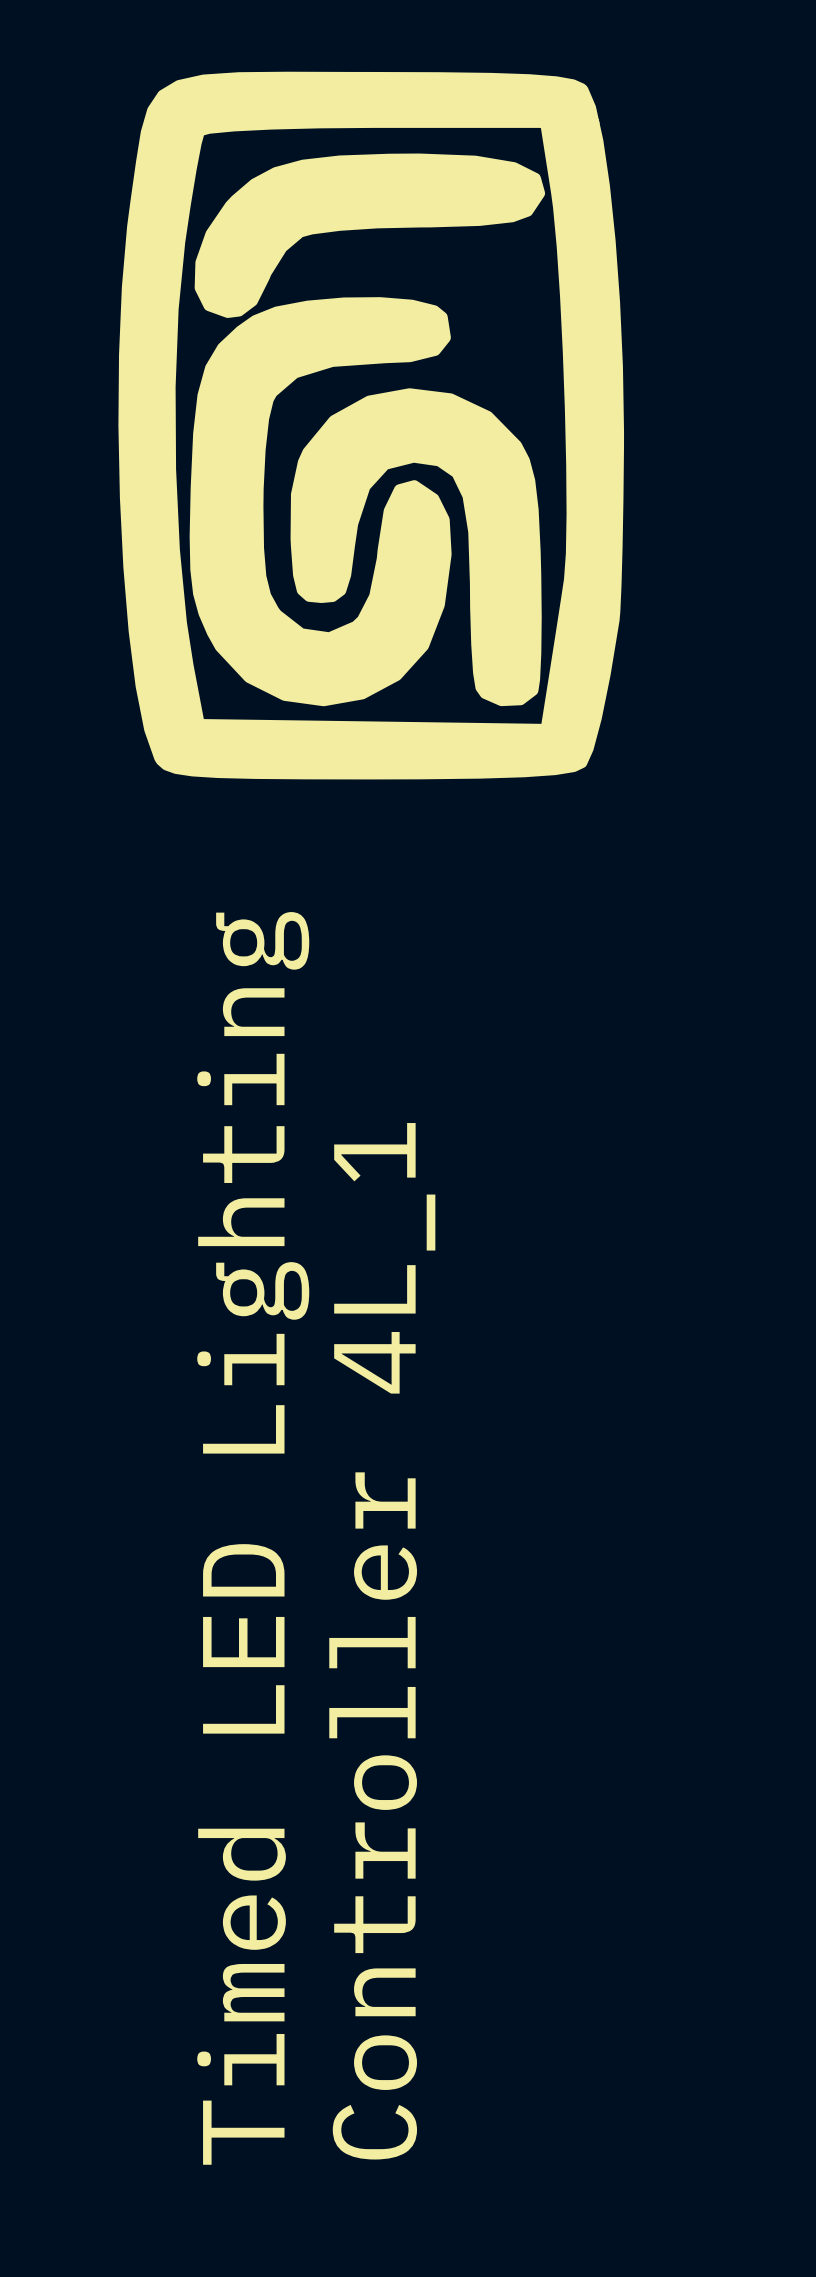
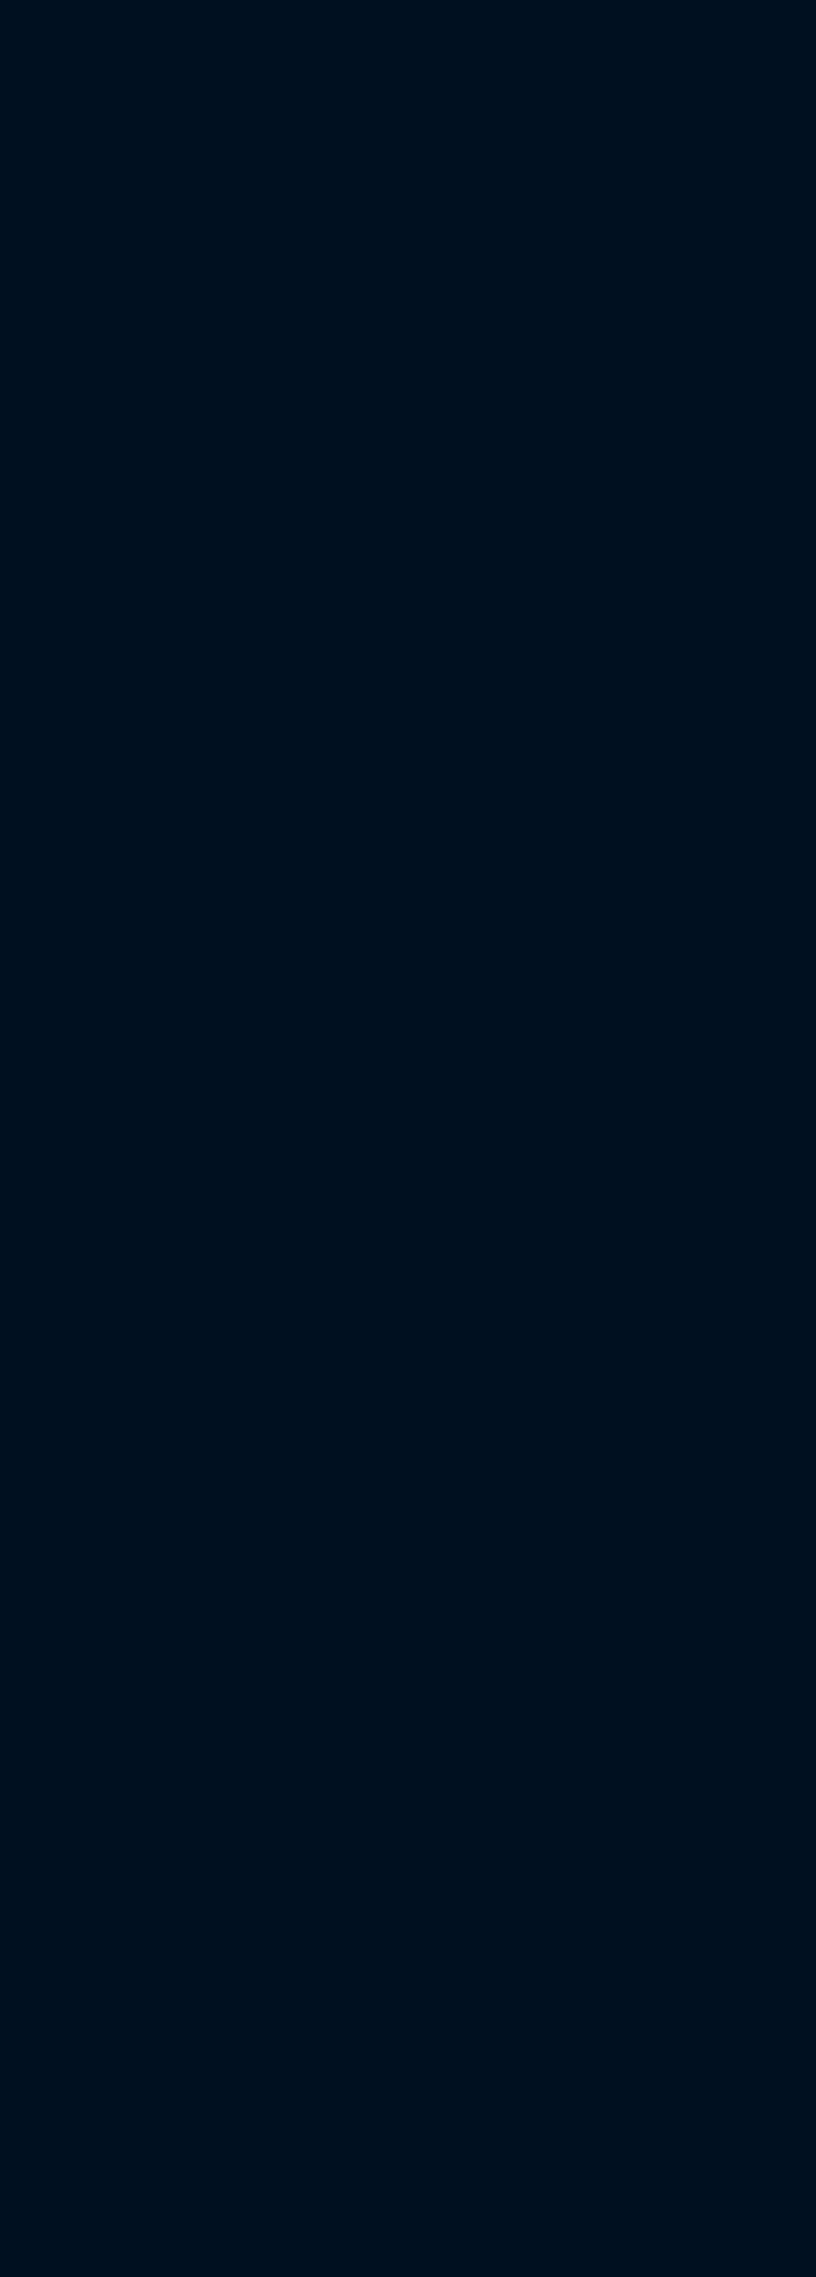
drawing: [118, 71, 625, 780] -> none
text: Timed LED Lighting (253, 1538) -> none
text: Controller 4L_1 (382, 1641) -> none

